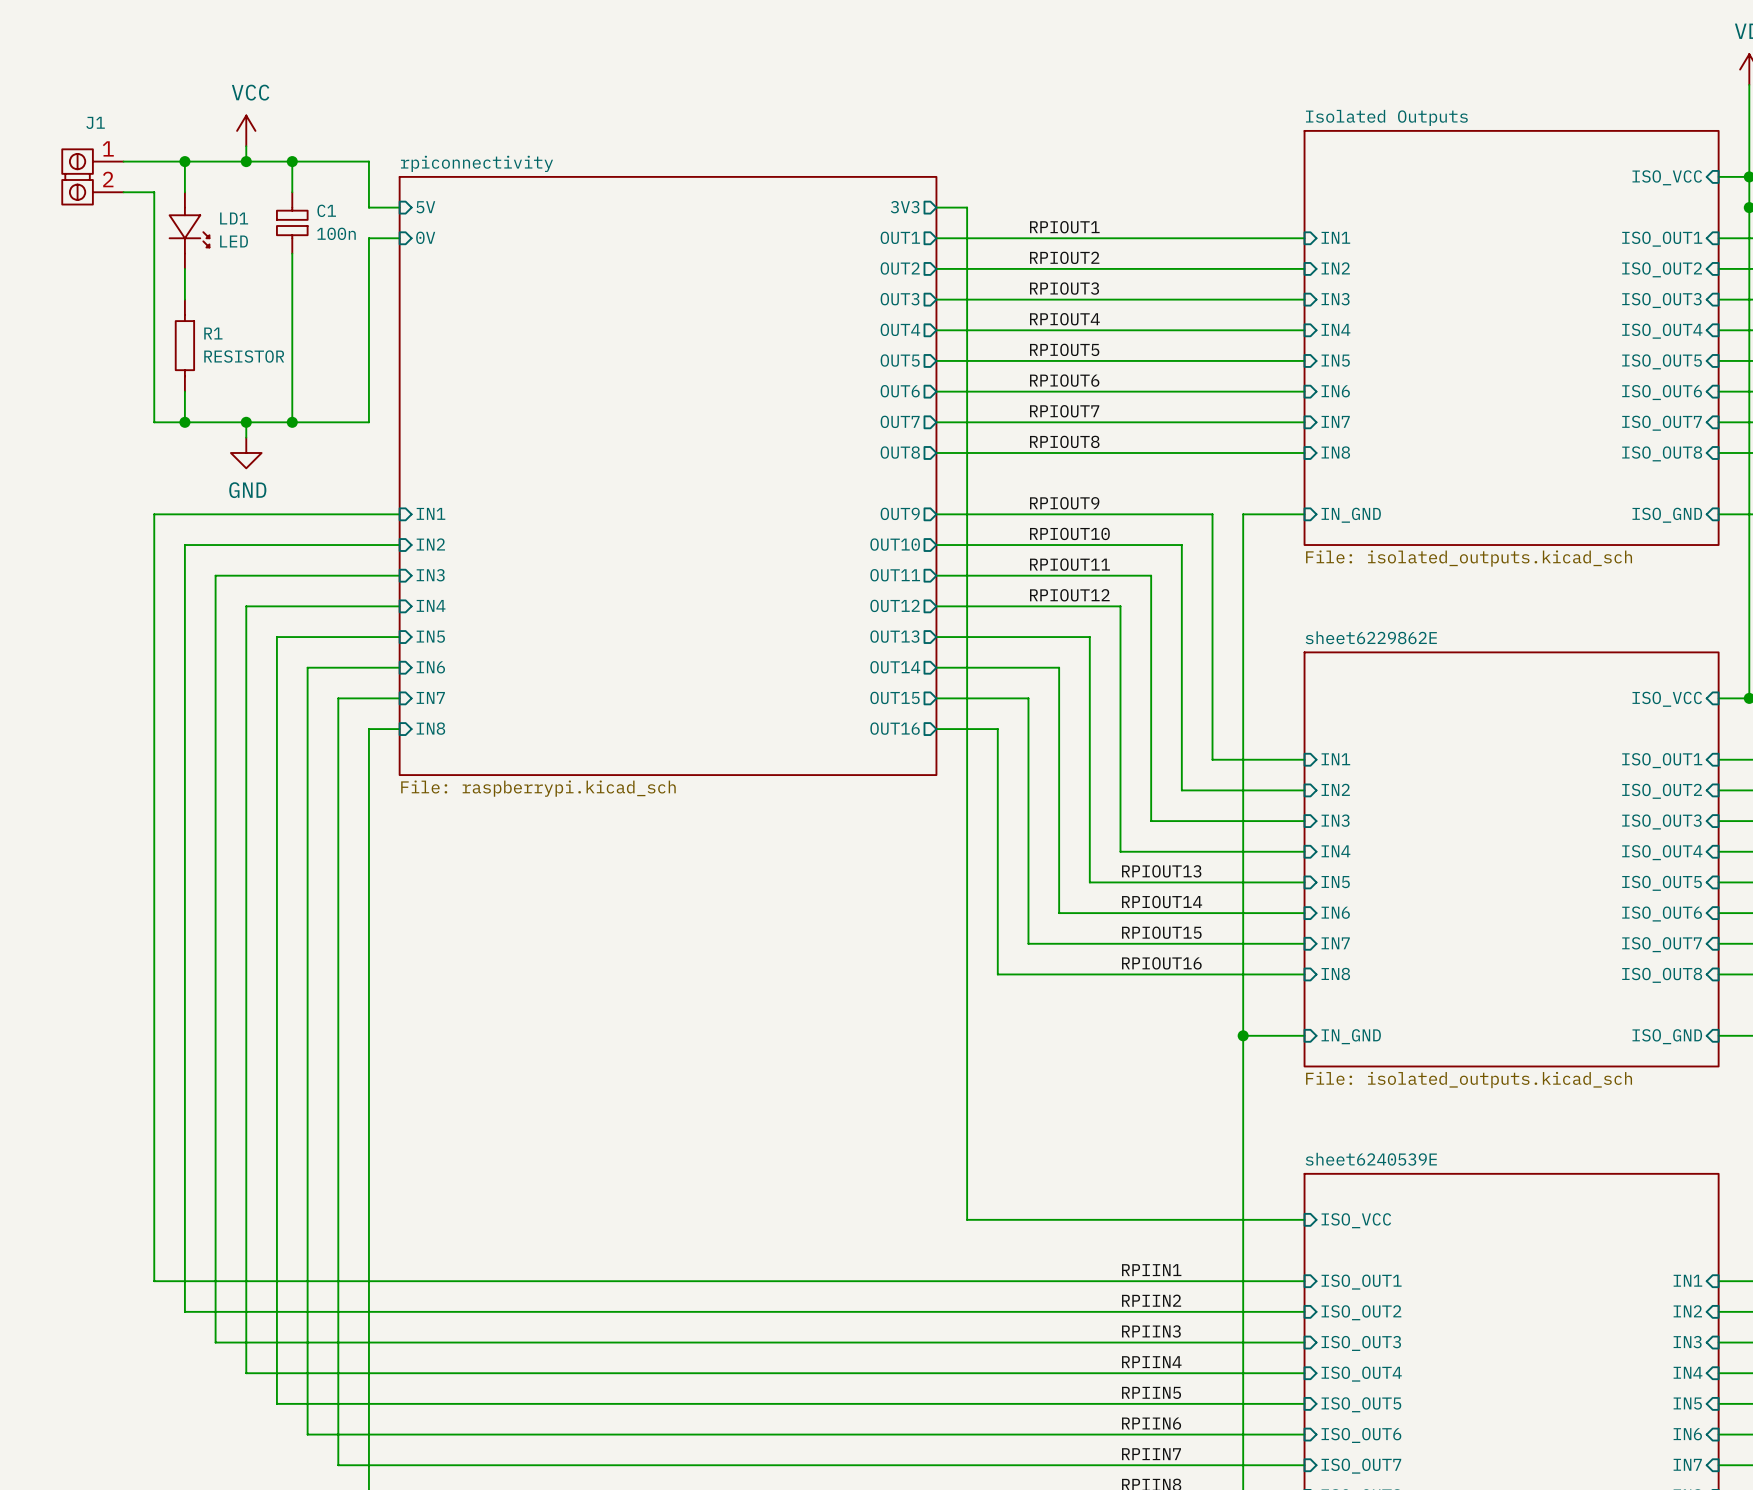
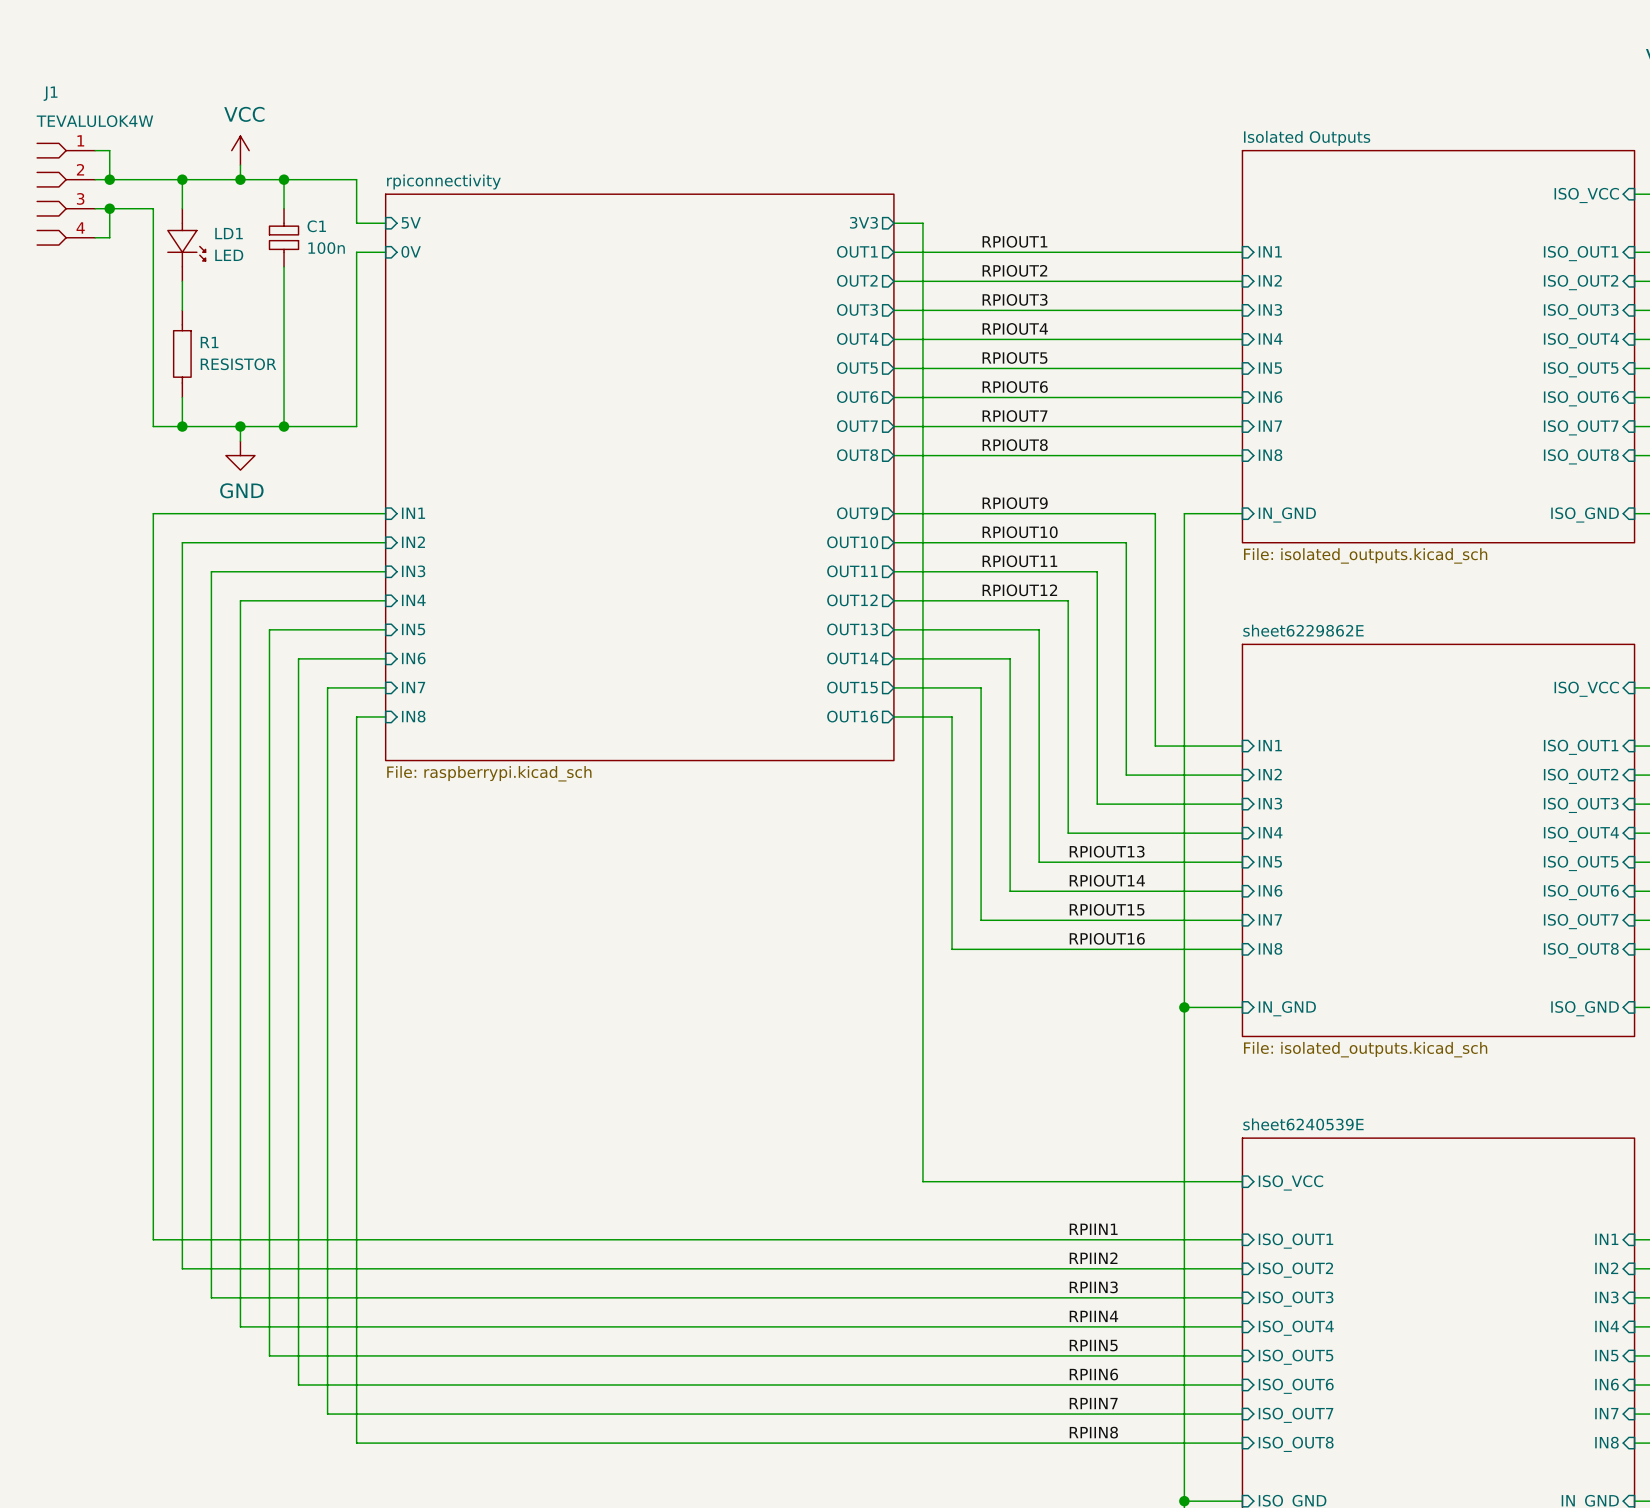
J1 value: none -> TEVALULOK4W (94, 121)
J1 name position: J1 (95, 122) -> J1 (50, 93)
wire: none -> (95, 150) (109, 150) (109, 179)
J1 symbol: [62, 149, 124, 205] -> [37, 143, 96, 246]
junction: none -> (109, 179)
wire: none -> (109, 208) (109, 237) (95, 237)
junction: none -> (109, 208)

